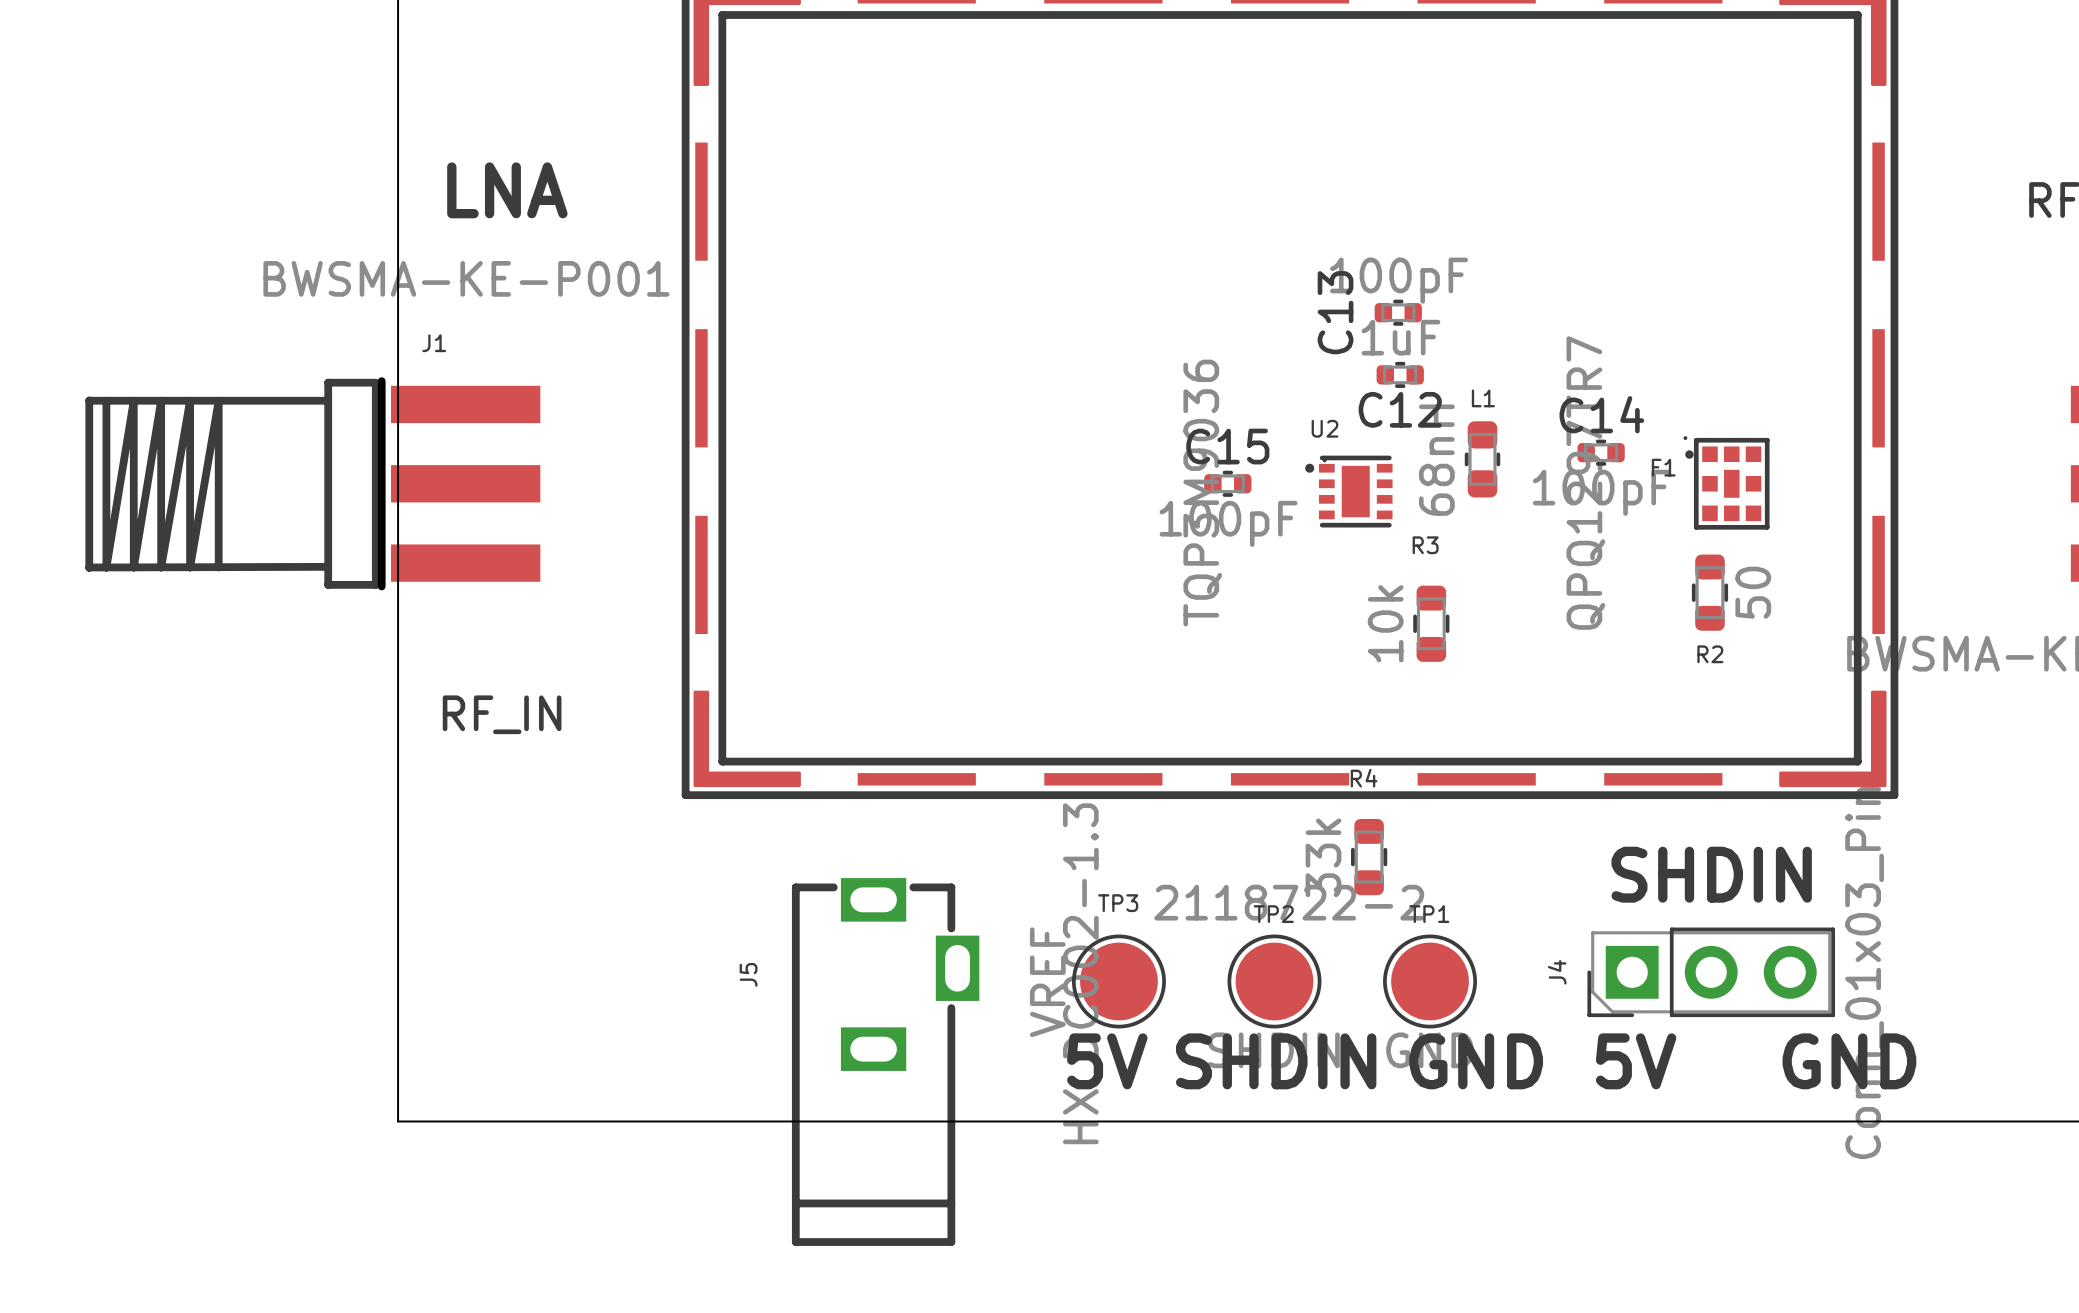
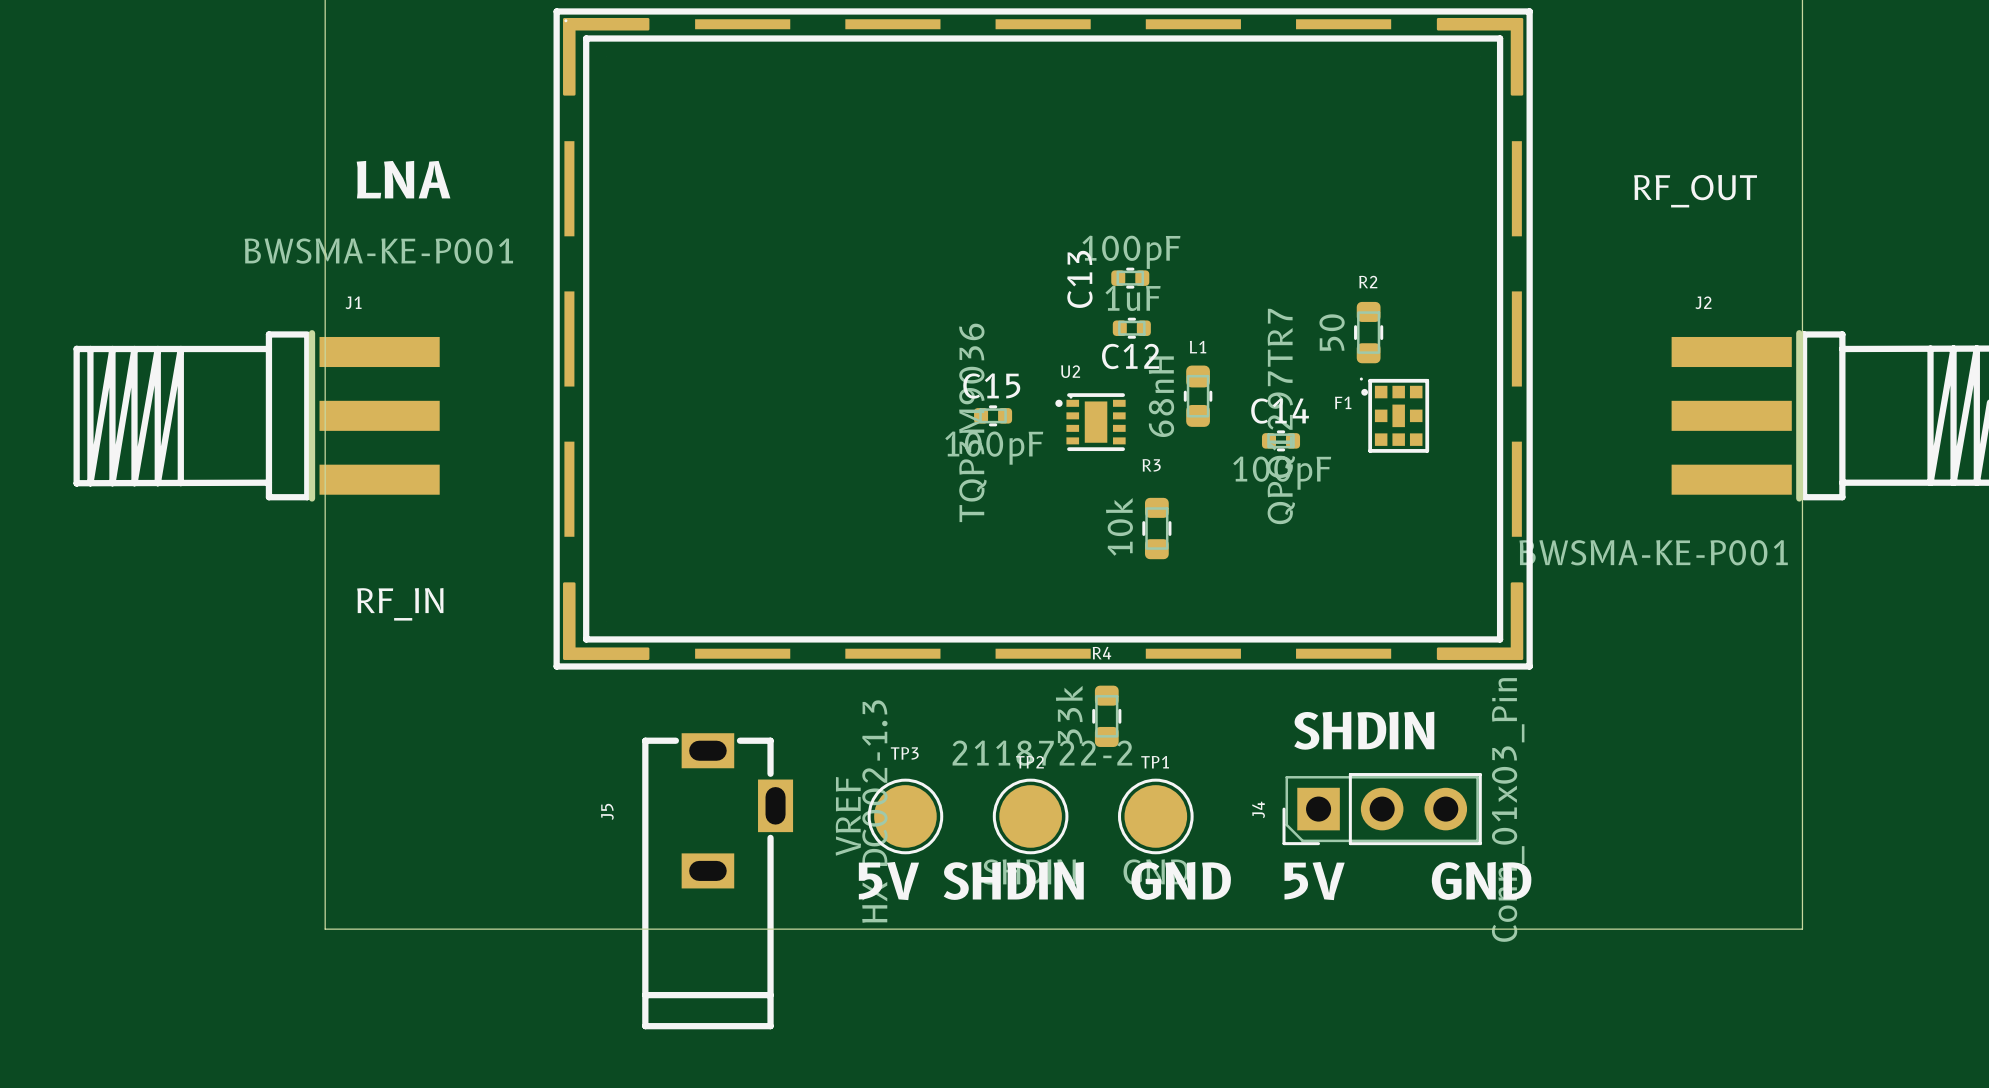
C14 position: (1601, 452) -> (1281, 440)
R2 position: (1709, 592) -> (1368, 332)
R2 value position: 50 (1753, 592) -> 50 (1332, 332)
R2 name position: R2 (1710, 654) -> R2 (1368, 282)

